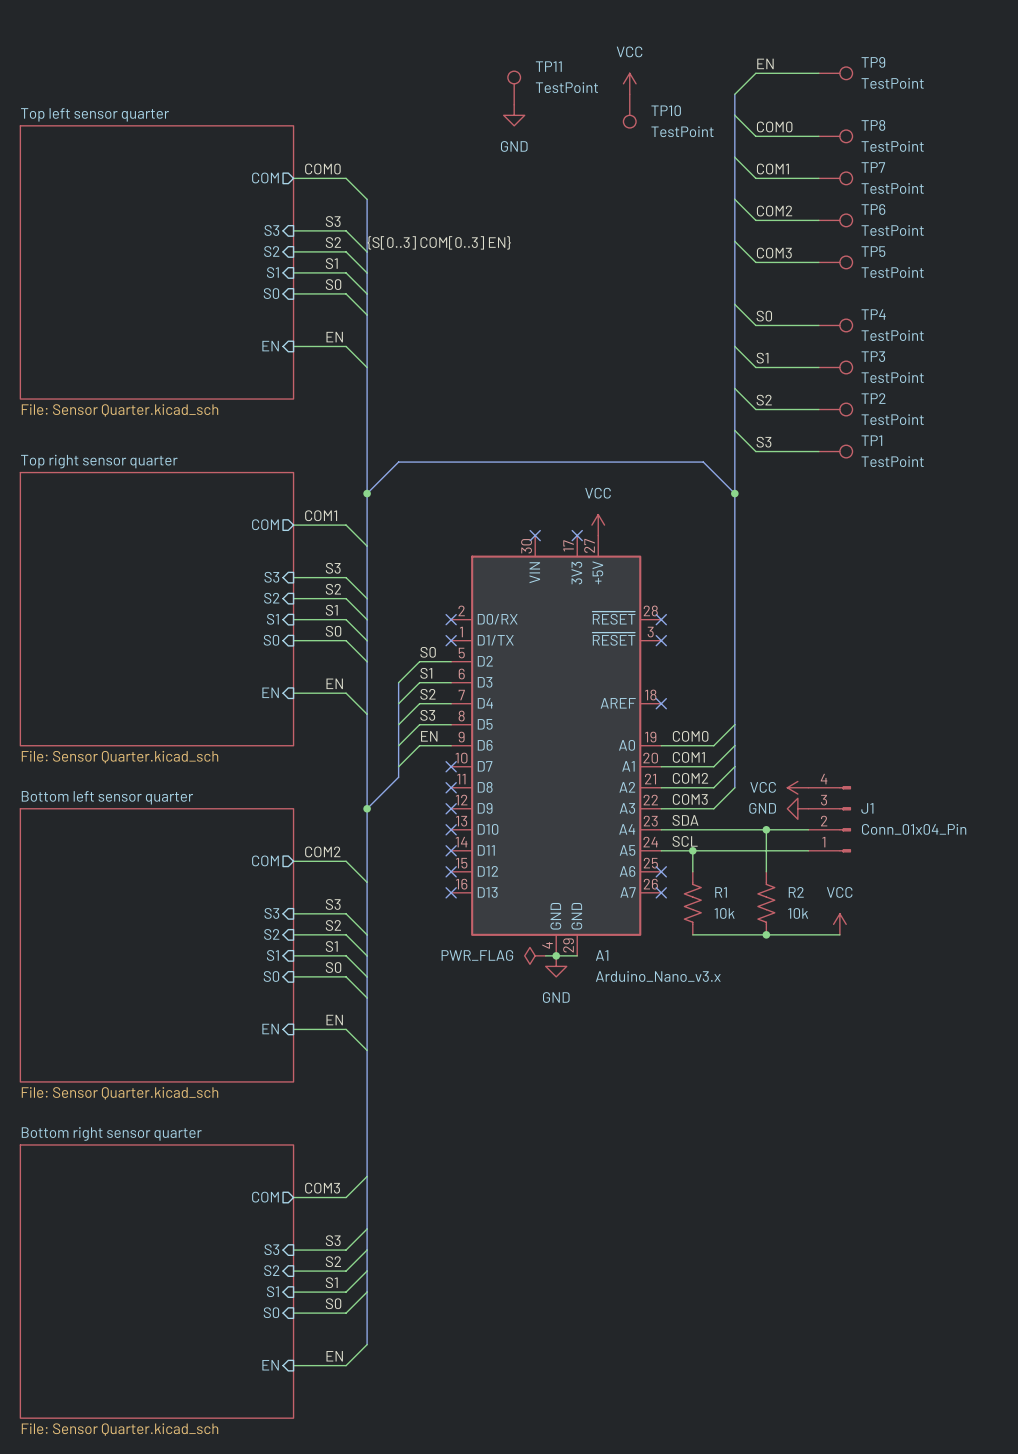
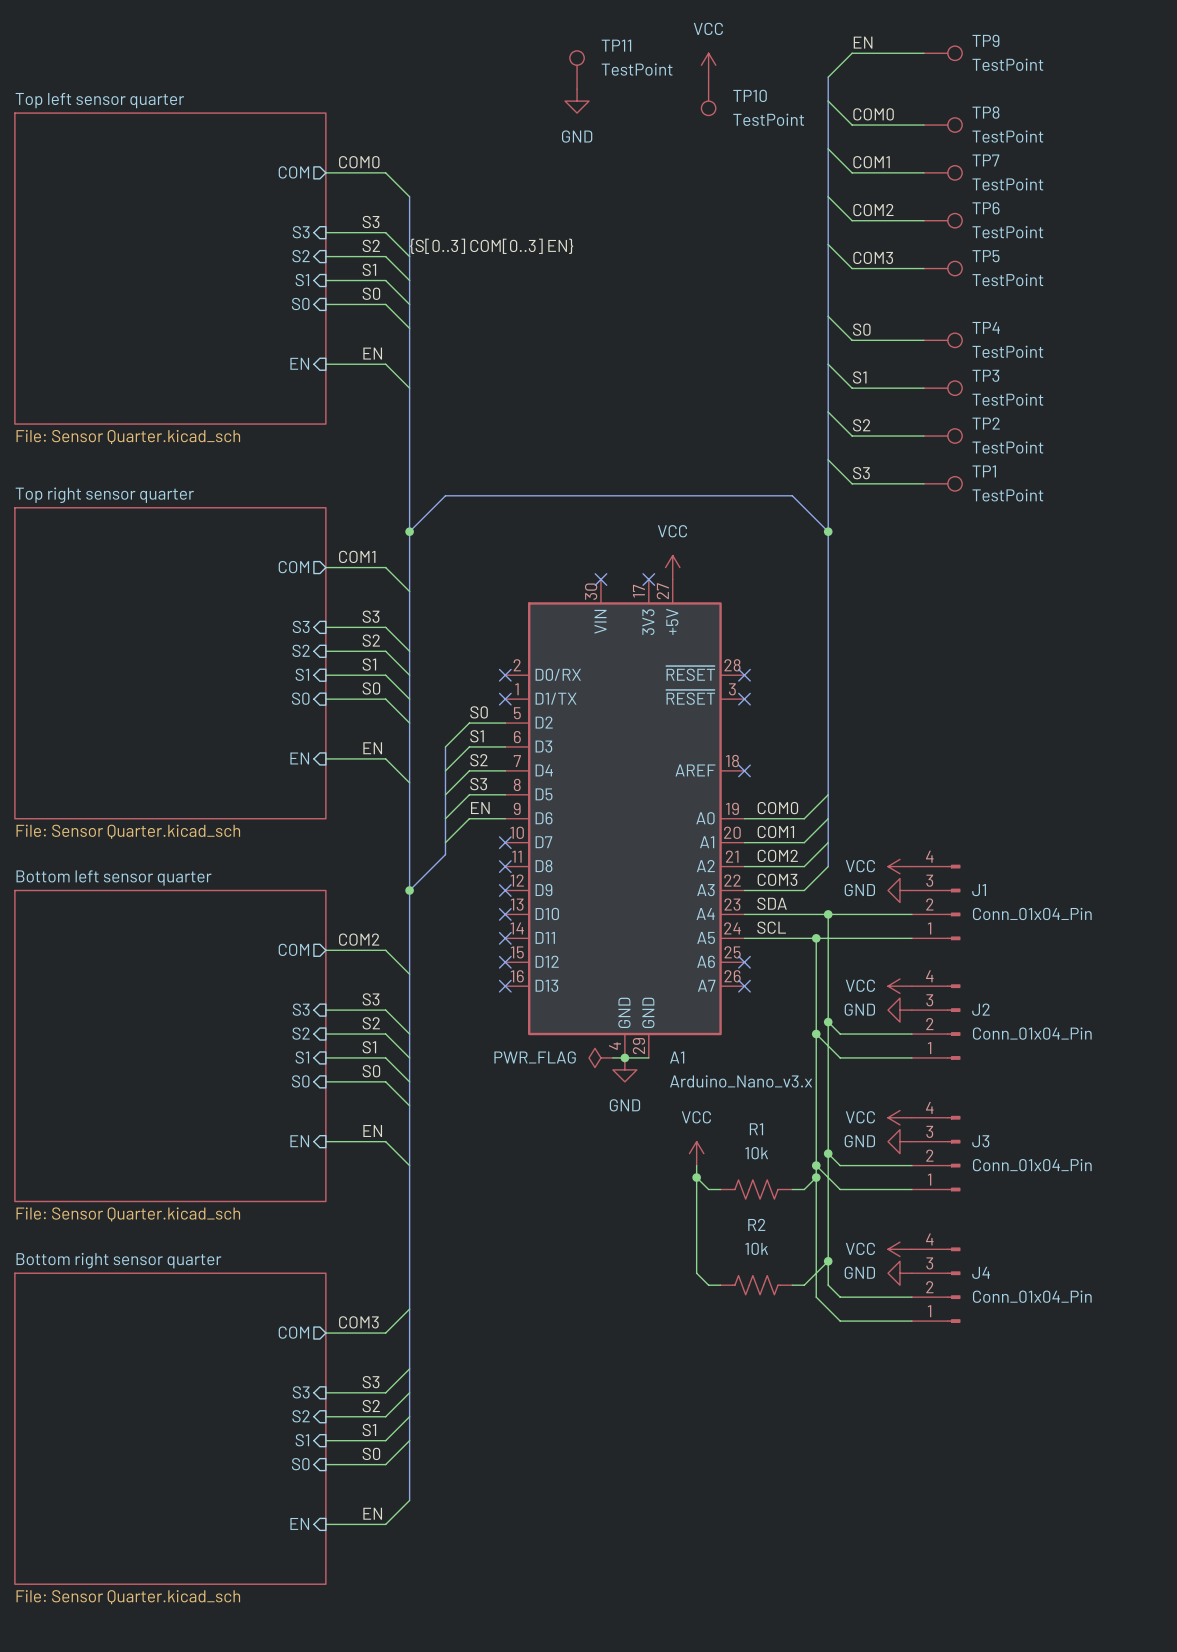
wire: none -> (828, 914) (828, 1285) (840, 1297) (911, 1297)
junction: none -> (828, 914)
wire: (766, 829) (766, 871) -> none
junction: (766, 829) -> none
wire: (692, 850) (692, 871) -> none
junction: (692, 850) -> none
wire: none -> (816, 938) (816, 1297) (840, 1321) (911, 1321)
junction: none -> (816, 938)
R1 name position: R1 (721, 892) -> R1 (756, 1129)
R2 name position: R2 (796, 892) -> R2 (756, 1224)
power symbol: none -> VCC (899, 986)
R1 rotation: 0° (692, 903) -> 90° clockwise (756, 1189)
R1 position: (692, 903) -> (756, 1189)
R2 rotation: 0° (766, 903) -> 90° clockwise (756, 1285)
R2 position: (766, 903) -> (756, 1285)
R1 value position: 10k (724, 913) -> 10k (756, 1153)
power symbol: none -> GND (899, 1010)
R2 value position: 10k (798, 913) -> 10k (756, 1248)
junction: none -> (828, 1022)
J2: none -> Conn_01x04_Pin (936, 1022)
power symbol: VCC (839, 924) -> none
wire: (692, 934) (745, 934) -> (828, 1022) (840, 1034)
wire: none -> (816, 1034) (840, 1057) (911, 1057)
junction: none -> (816, 1034)
junction: (766, 934) -> none
power symbol: none -> VCC (899, 1117)
power symbol: none -> GND (899, 1141)
power symbol: none -> VCC (696, 1153)
wire: none -> (828, 1153) (840, 1165) (911, 1165)
junction: none -> (828, 1153)
J3: none -> Conn_01x04_Pin (936, 1153)
wire: none -> (696, 1165) (696, 1273) (708, 1285) (720, 1285)
wire: none -> (816, 1165) (840, 1189) (911, 1189)
junction: none -> (816, 1165)
wire: none -> (696, 1177) (708, 1189) (720, 1189)
junction: none -> (696, 1177)
wire: none -> (816, 1177) (804, 1189) (792, 1189)
junction: none -> (816, 1177)
power symbol: none -> VCC (899, 1249)
wire: none -> (828, 1261) (804, 1285) (792, 1285)
junction: none -> (828, 1261)
power symbol: none -> GND (899, 1273)
J4: none -> Conn_01x04_Pin (936, 1285)

